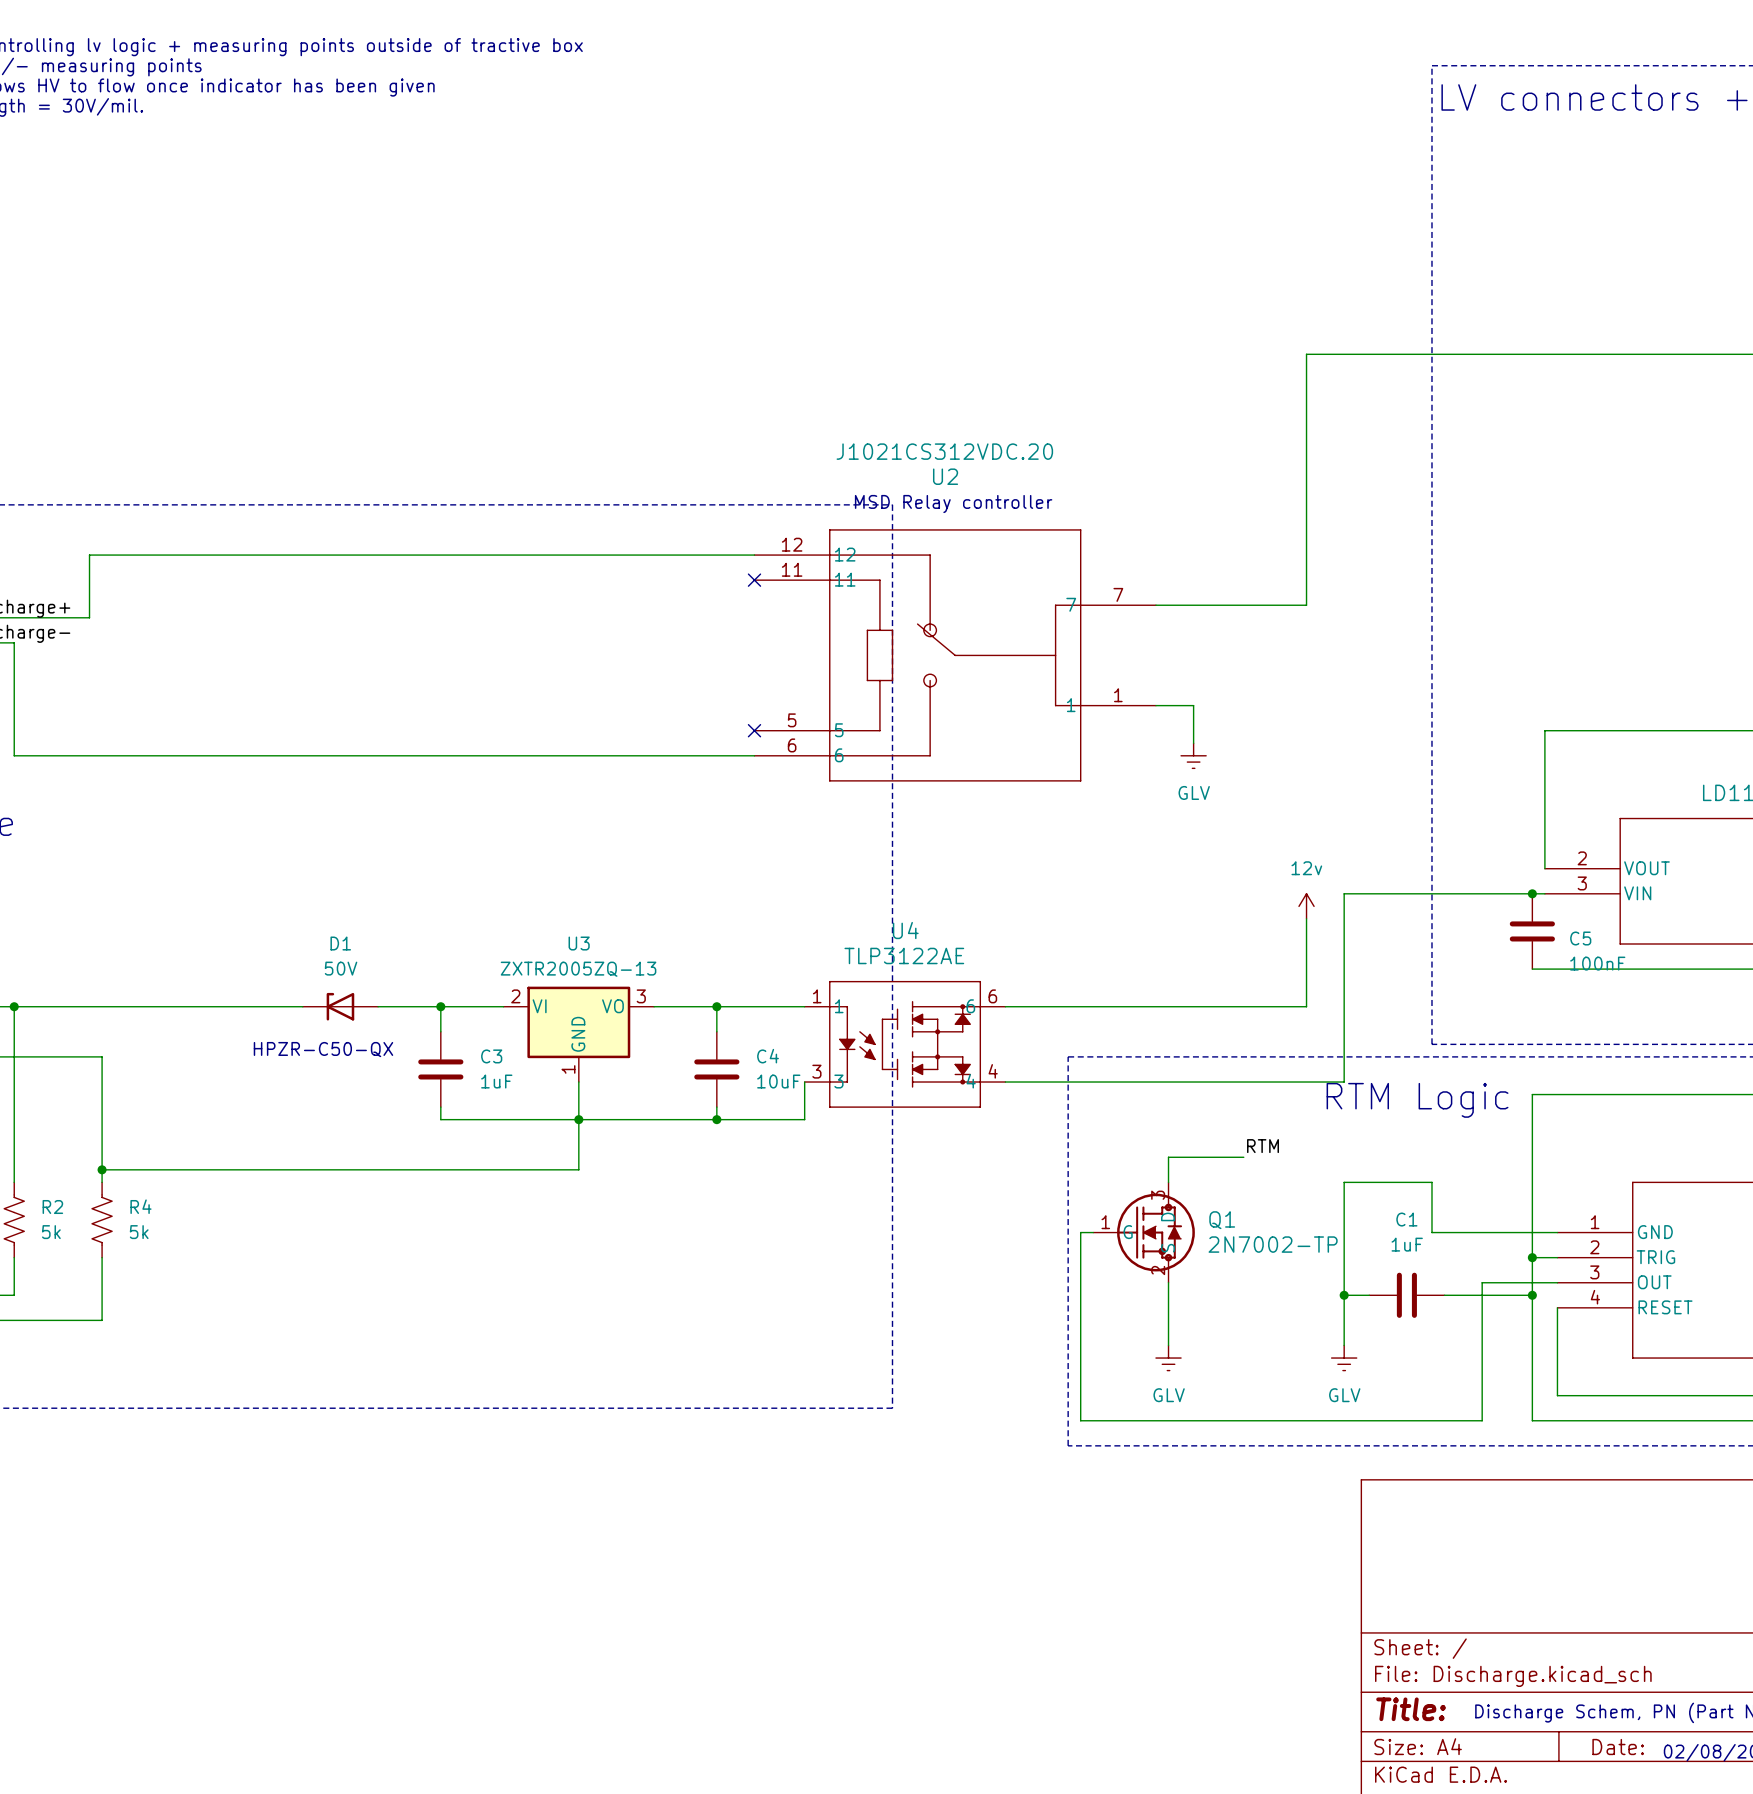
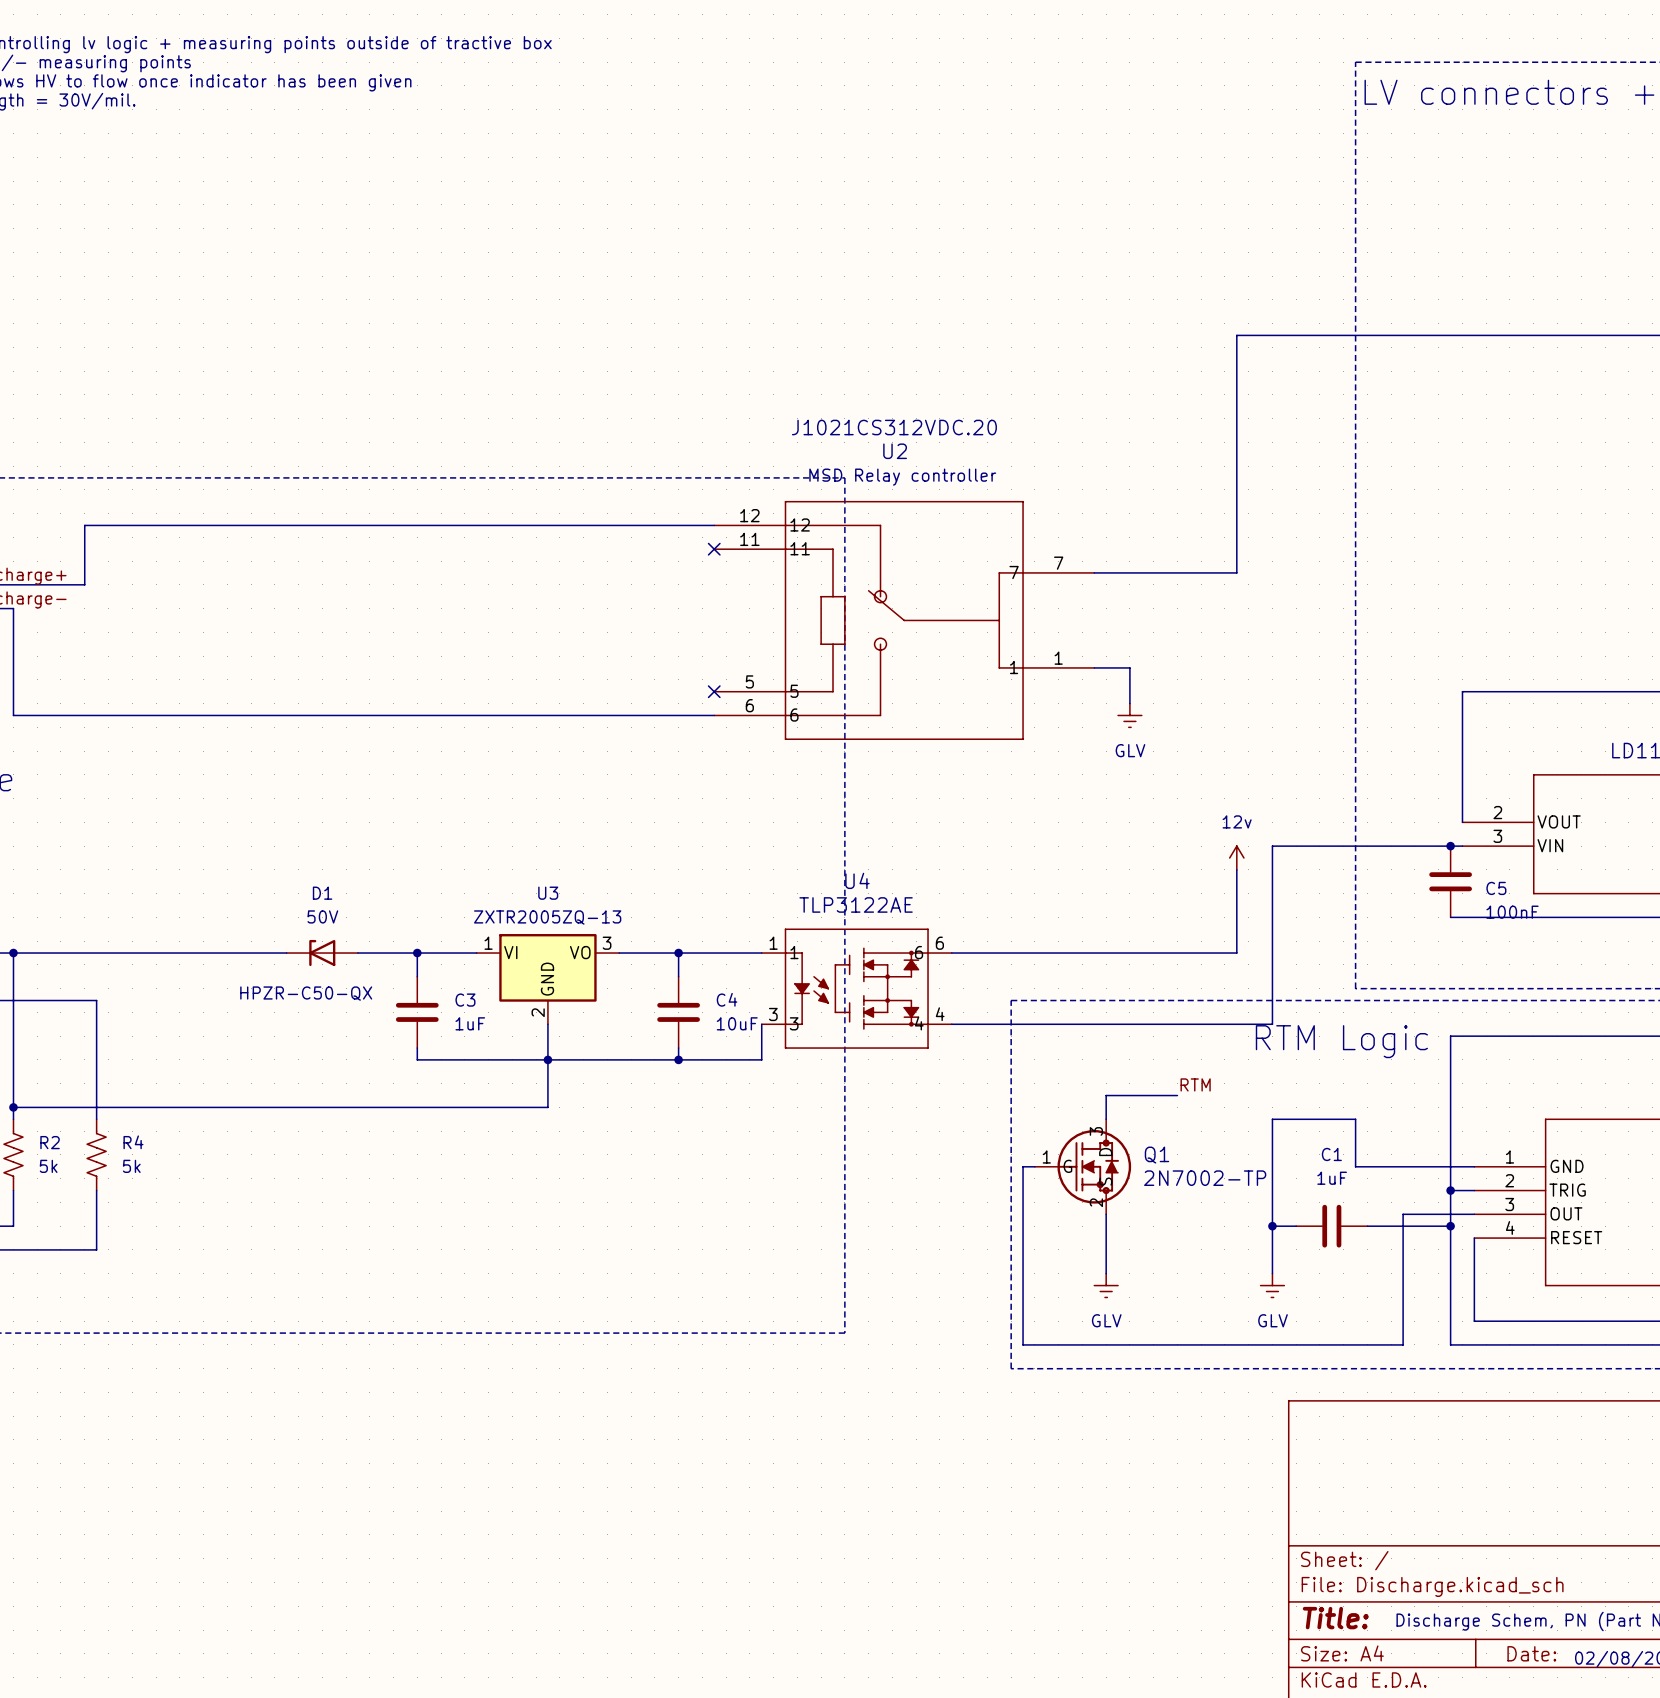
U3 pin number: 2 (515, 996) -> 1 (488, 943)
U3 pin number: 1 (568, 1069) -> 2 (538, 1012)
wire: none -> (13, 1107) (96, 1107)
junction: none -> (13, 1107)
junction: (102, 1169) -> none

